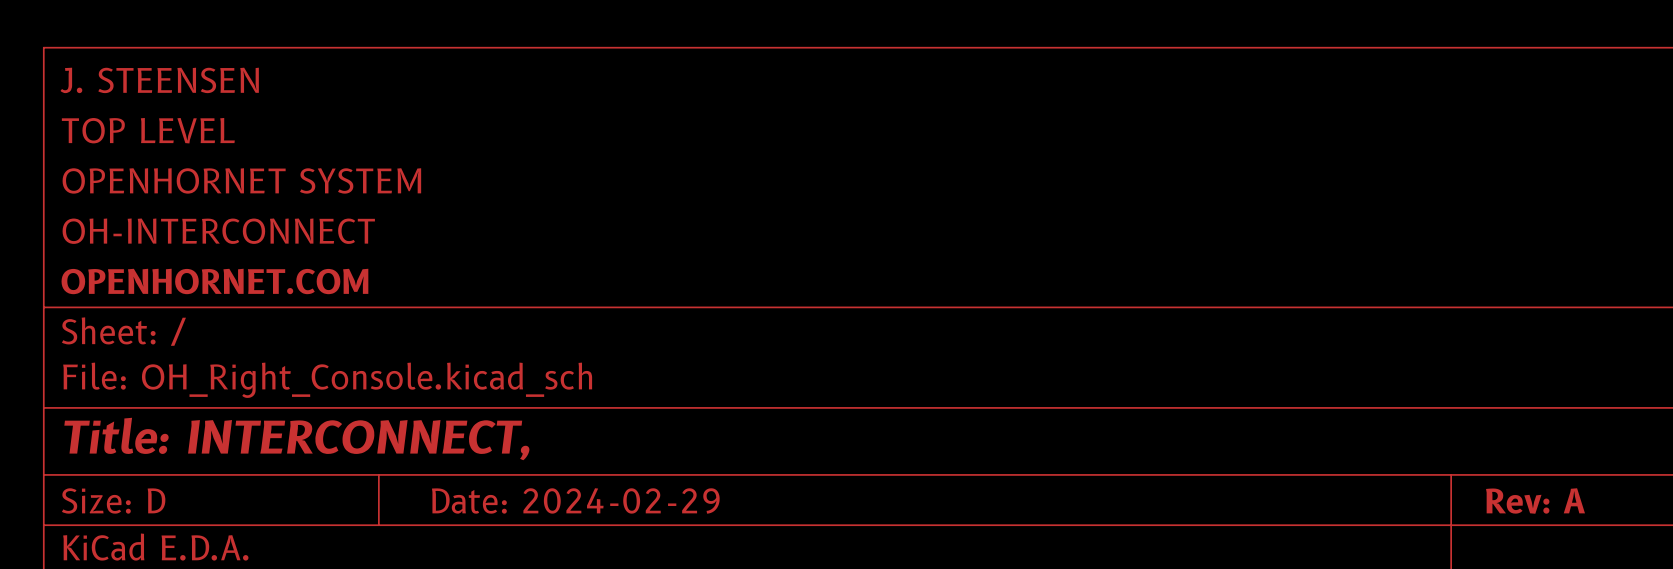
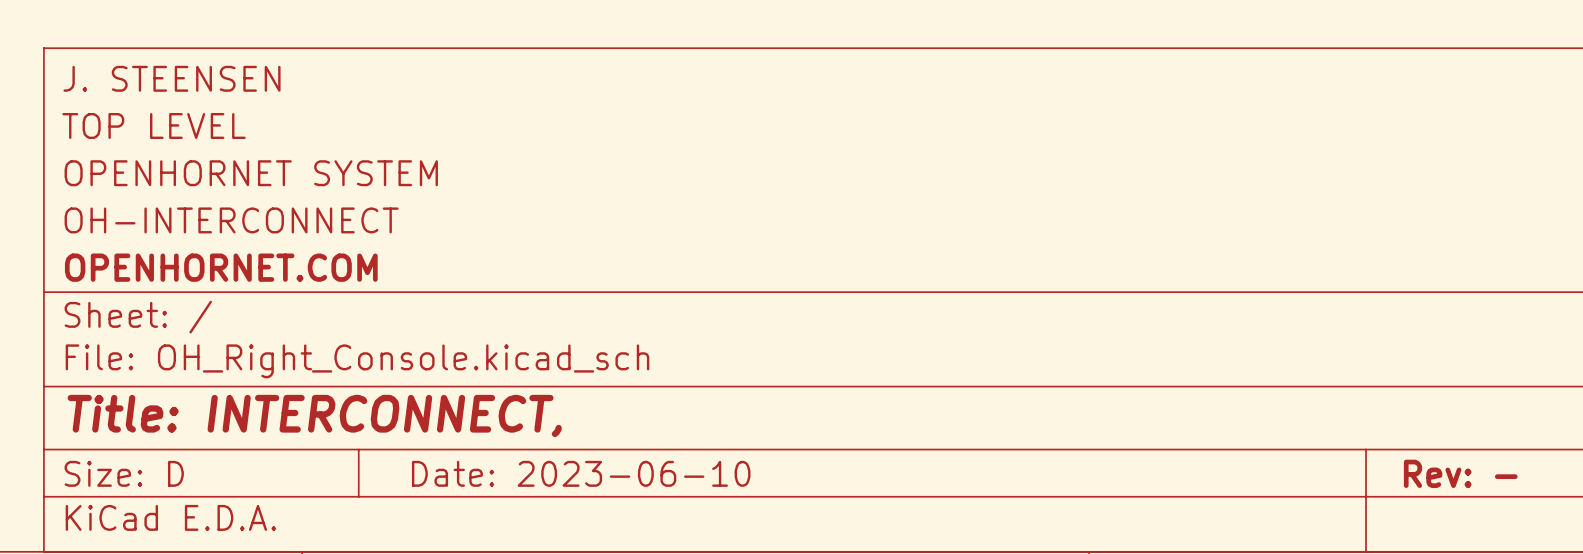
title block: Date: 2024-02-29 (575, 500) -> Date: 2023-06-10 (581, 473)
title block: Rev: A (1535, 501) -> Rev: - (1460, 473)

